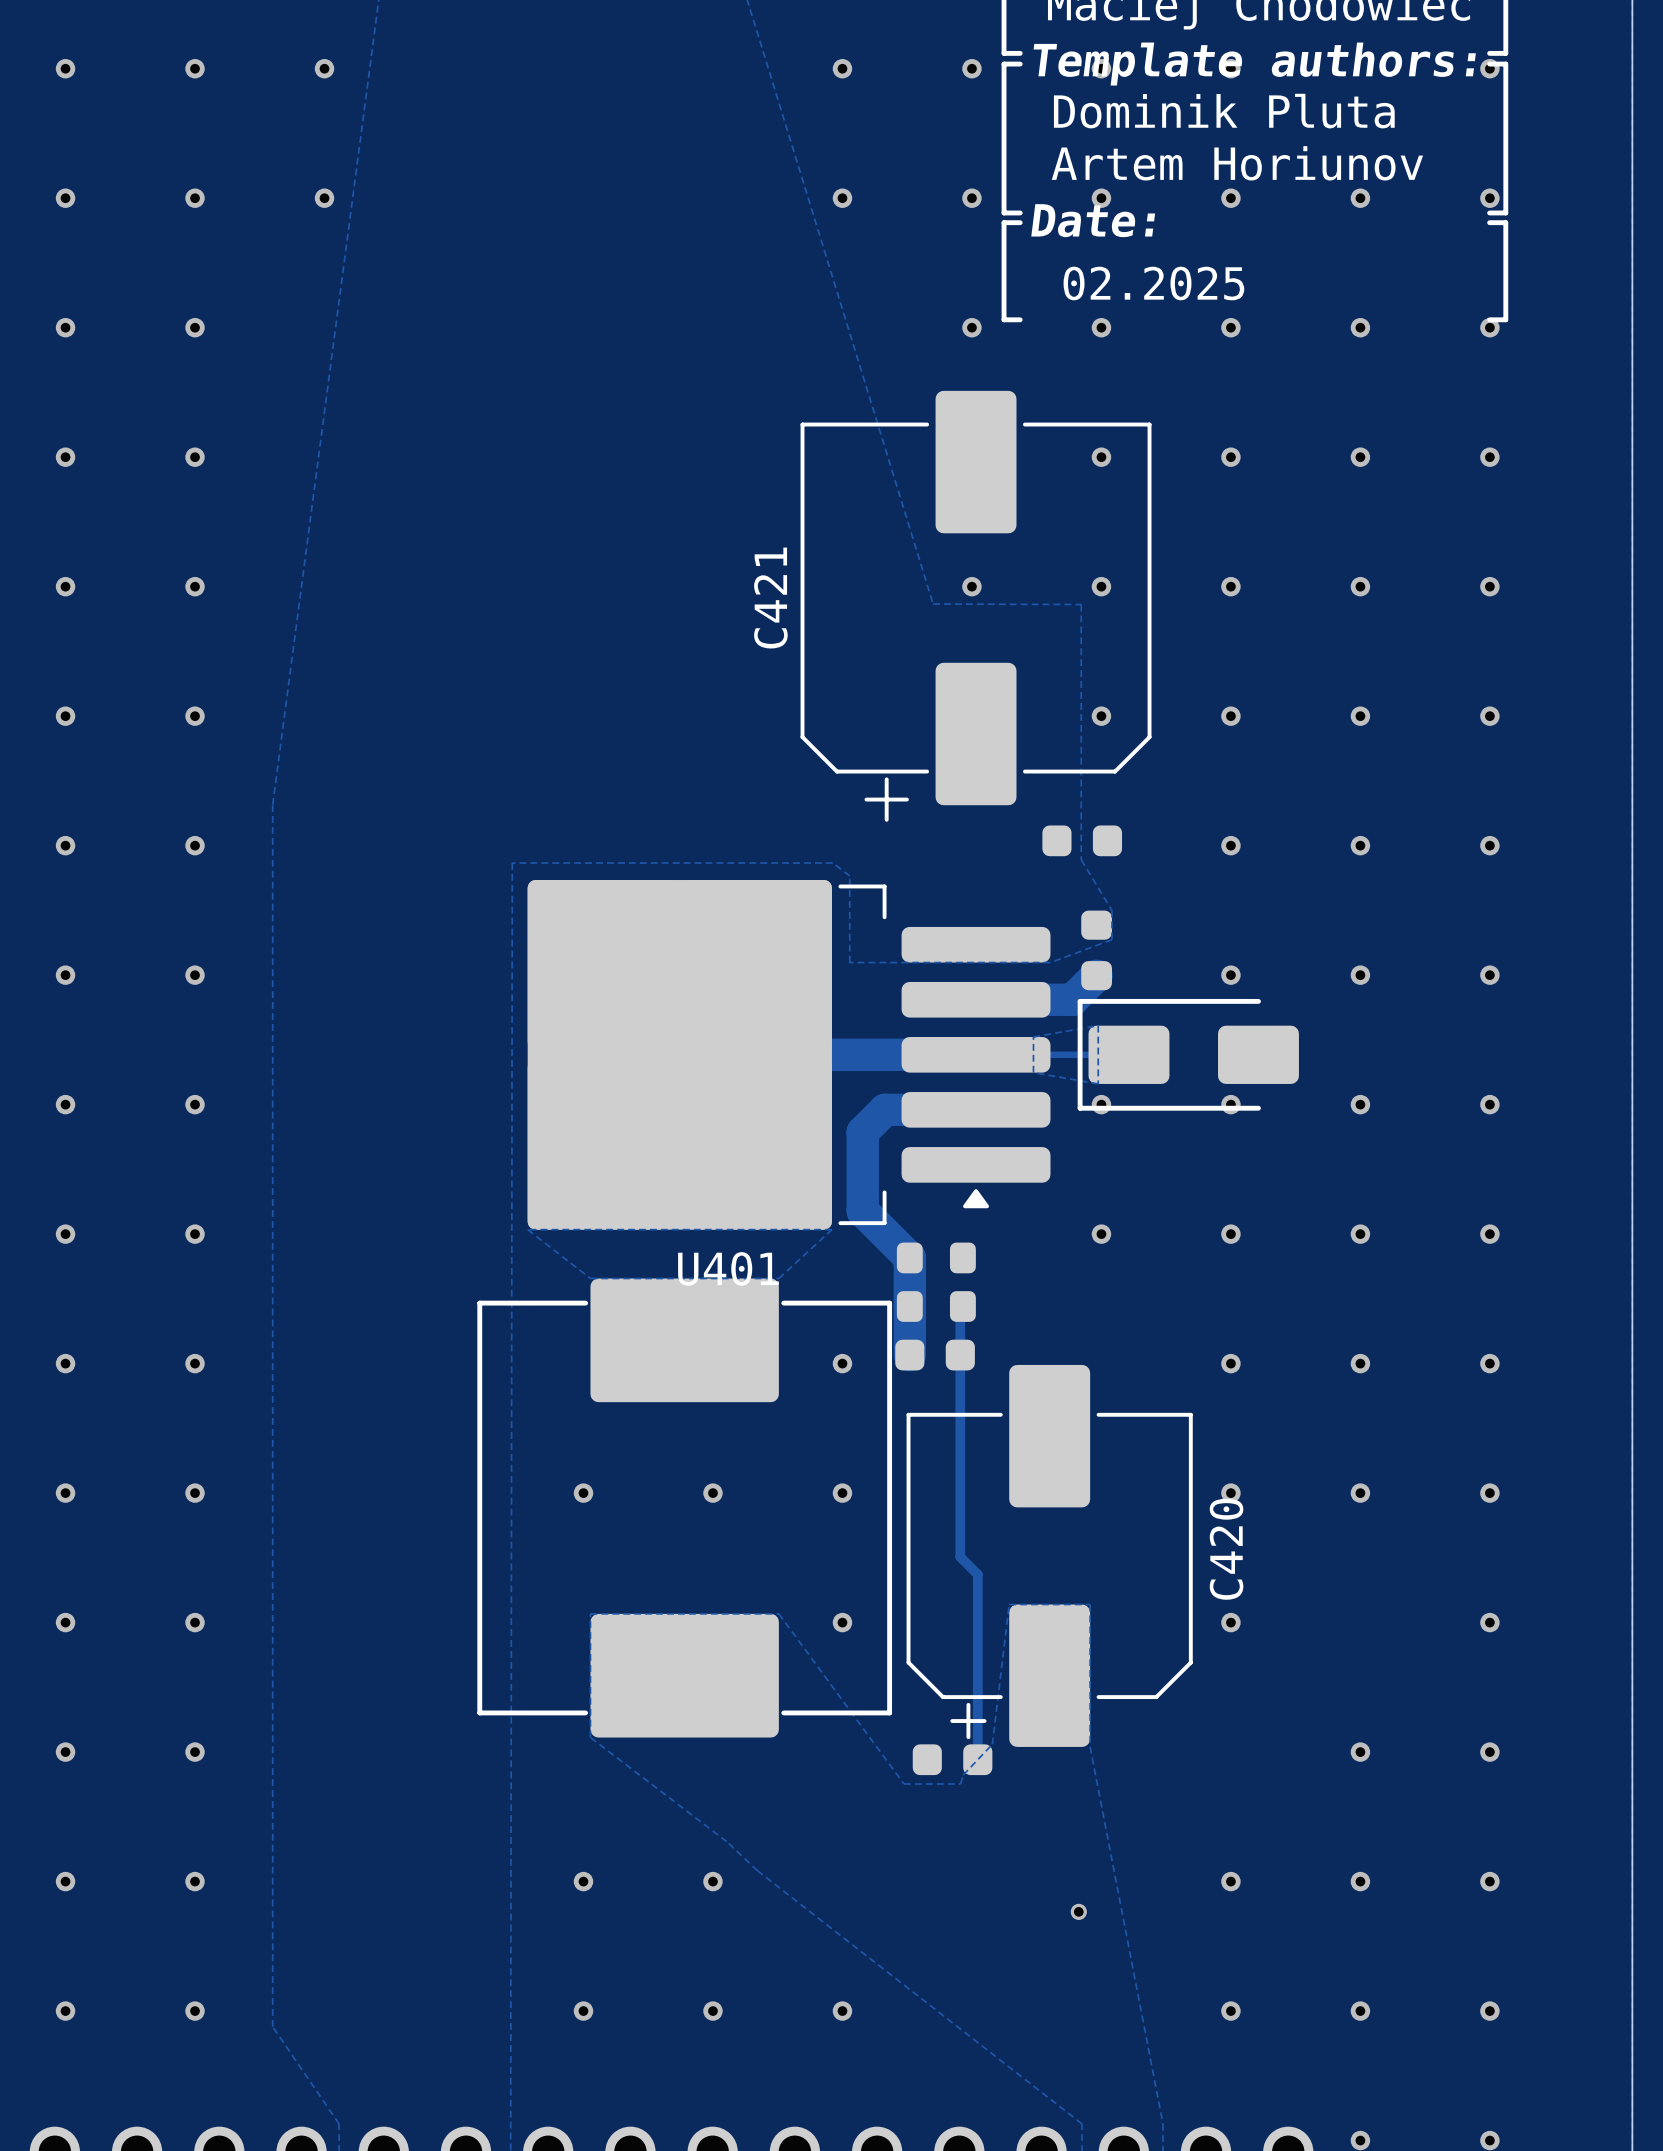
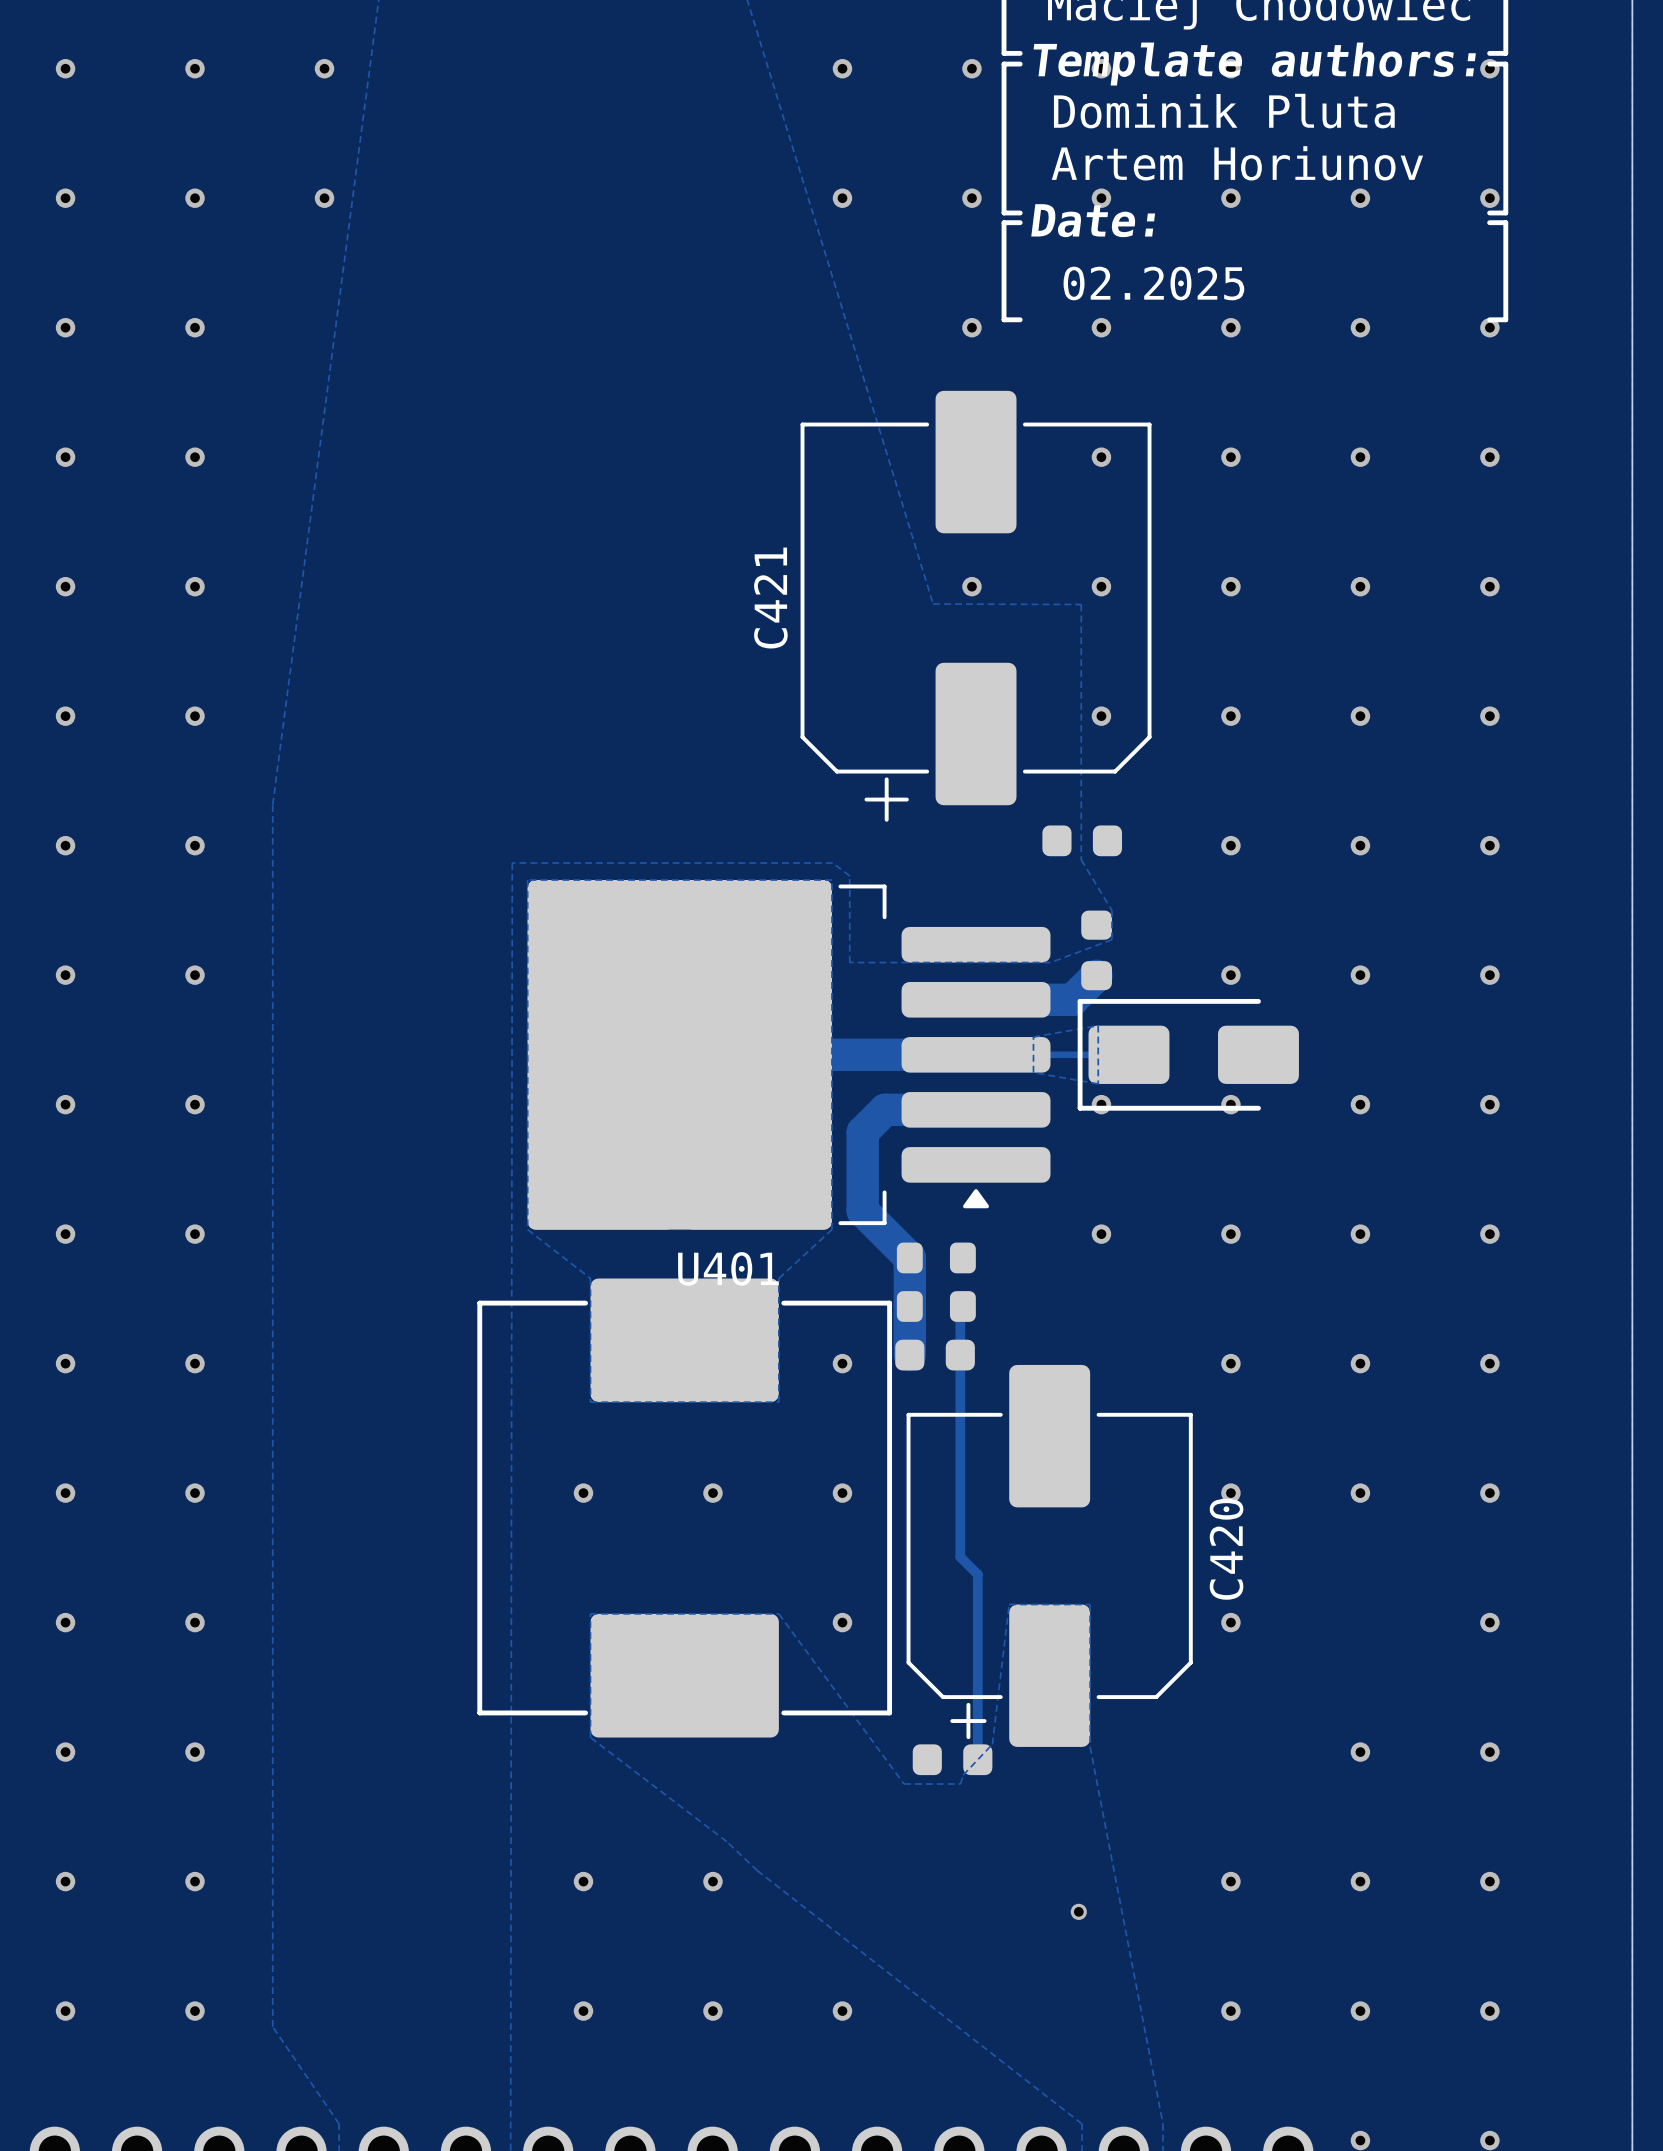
zone outline: (527, 1229) (831, 1229) -> (527, 1229) (527, 880) (831, 880) (831, 1229)
zone outline: (590, 1278) (778, 1278) -> (590, 1278) (590, 1402) (778, 1402) (778, 1278)

